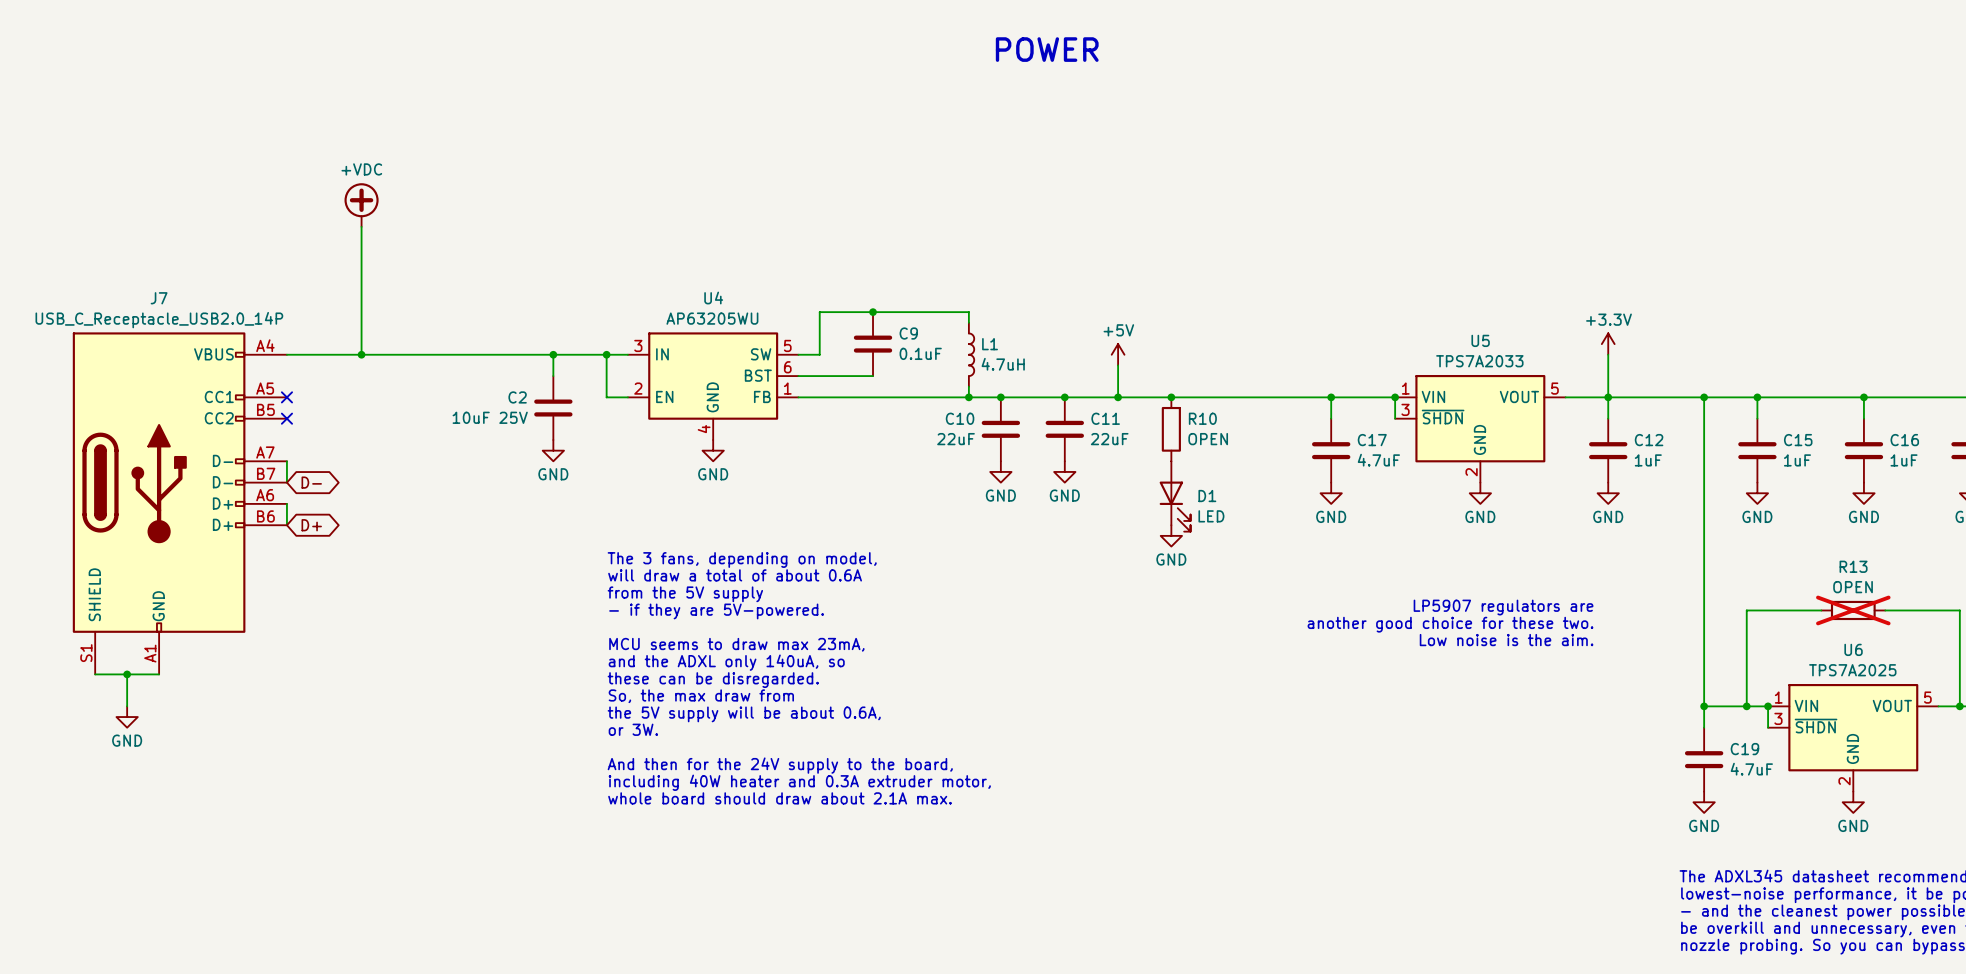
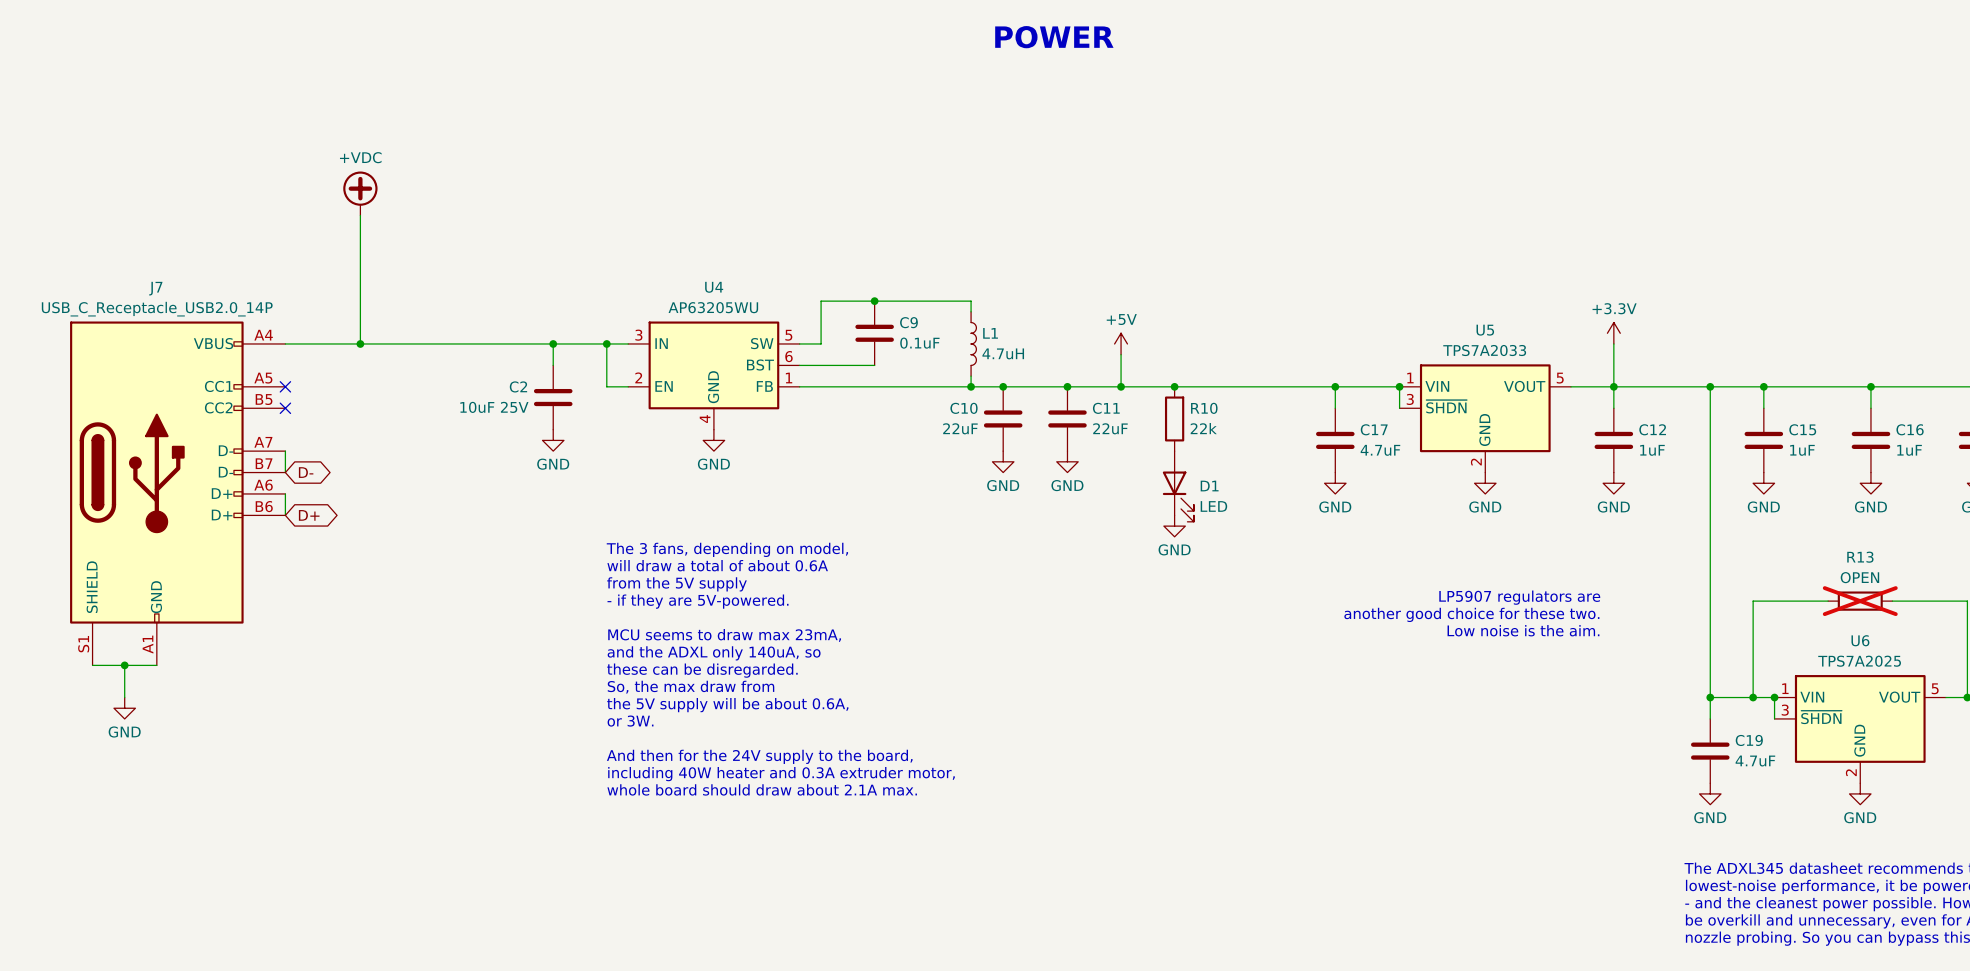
R10 value: OPEN (1208, 439) -> 22k (1203, 428)

